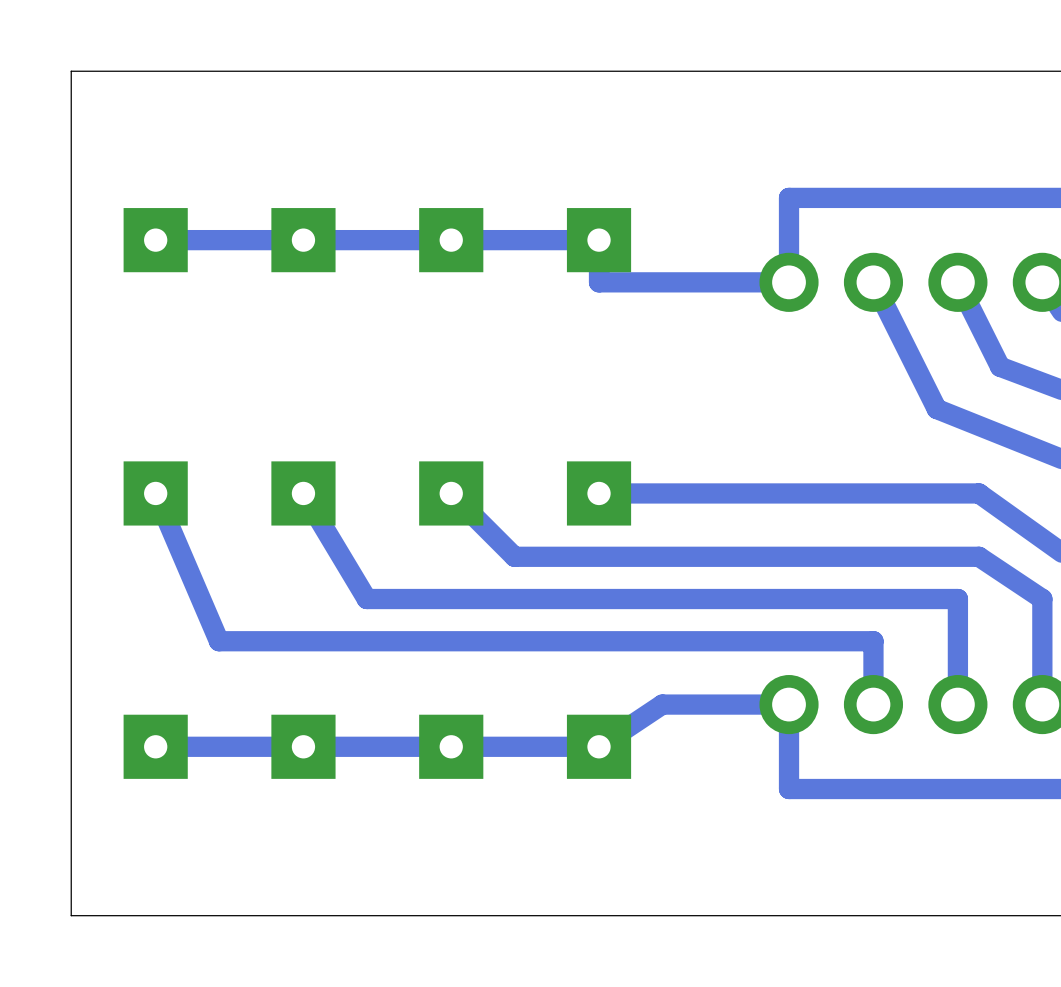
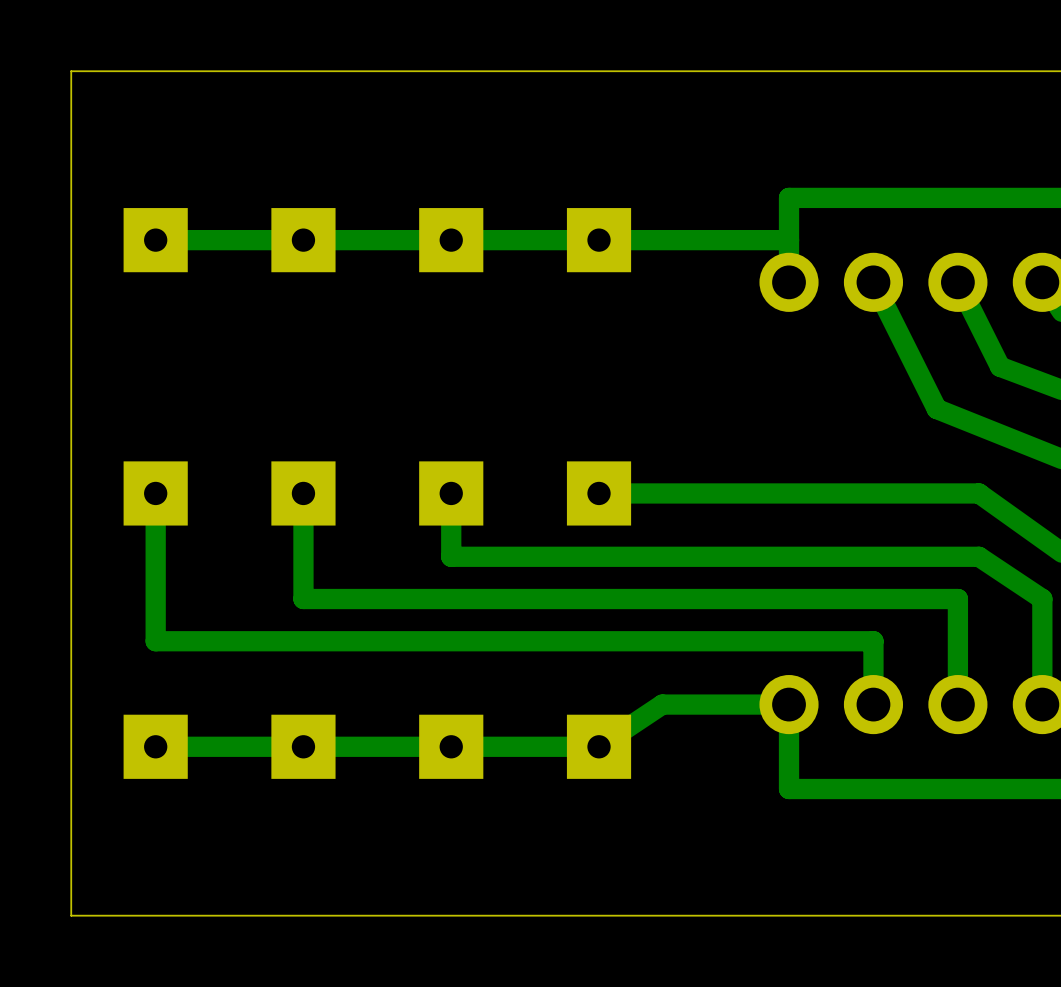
track: (599, 240) (599, 282) (789, 282) -> none
track: none -> (789, 240) (451, 240)
track: (155, 493) (219, 641) -> (155, 493) (155, 641) (219, 641)
track: (303, 493) (366, 599) -> (303, 493) (303, 599) (366, 599)
track: (451, 493) (514, 556) -> (451, 493) (451, 556) (514, 556)

